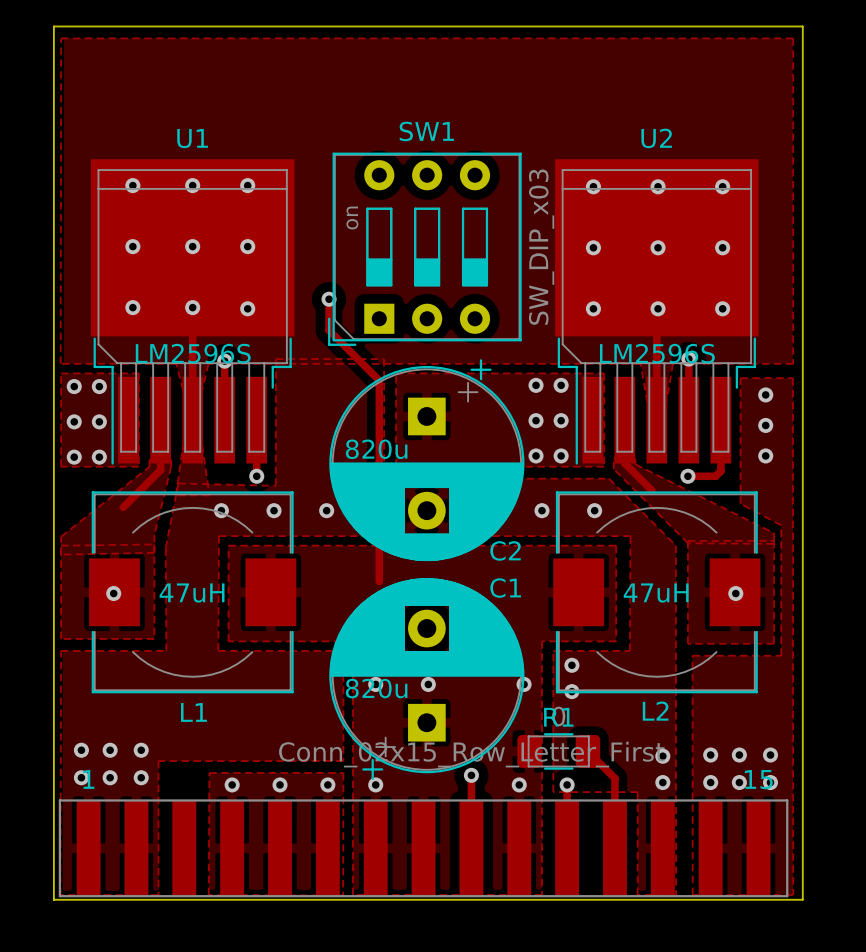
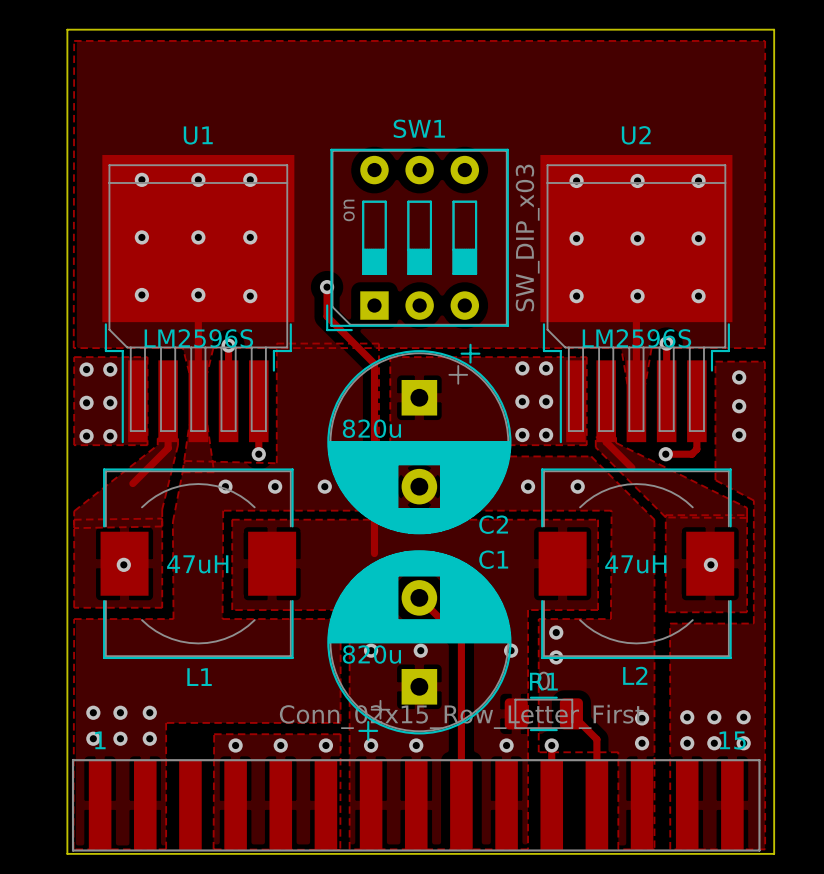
track: none -> (419, 597) (461, 639) (461, 736)
via position: (471, 775) -> (416, 745)

